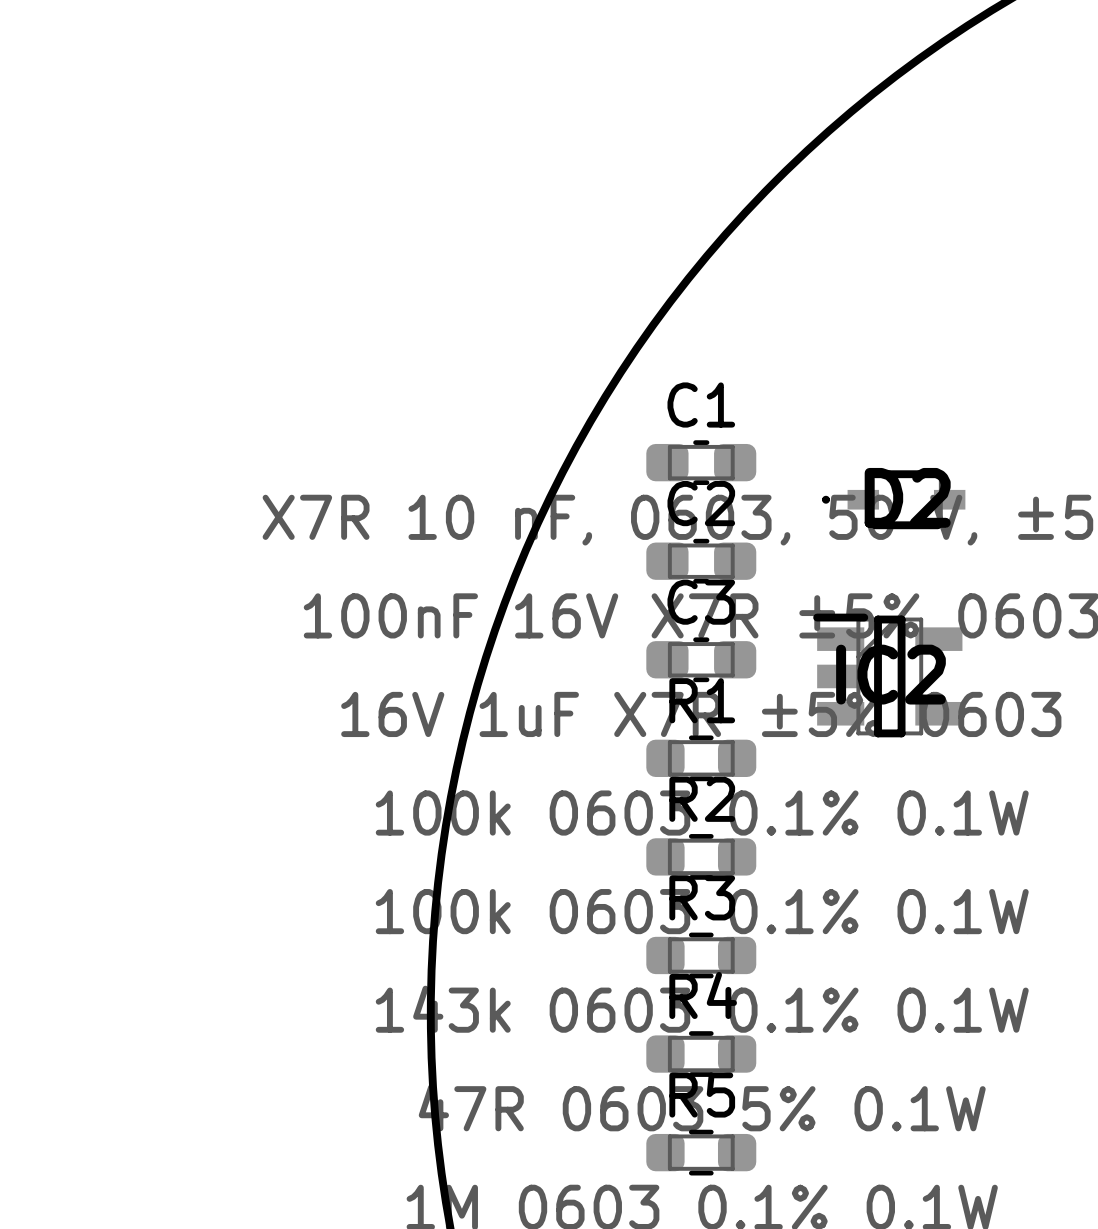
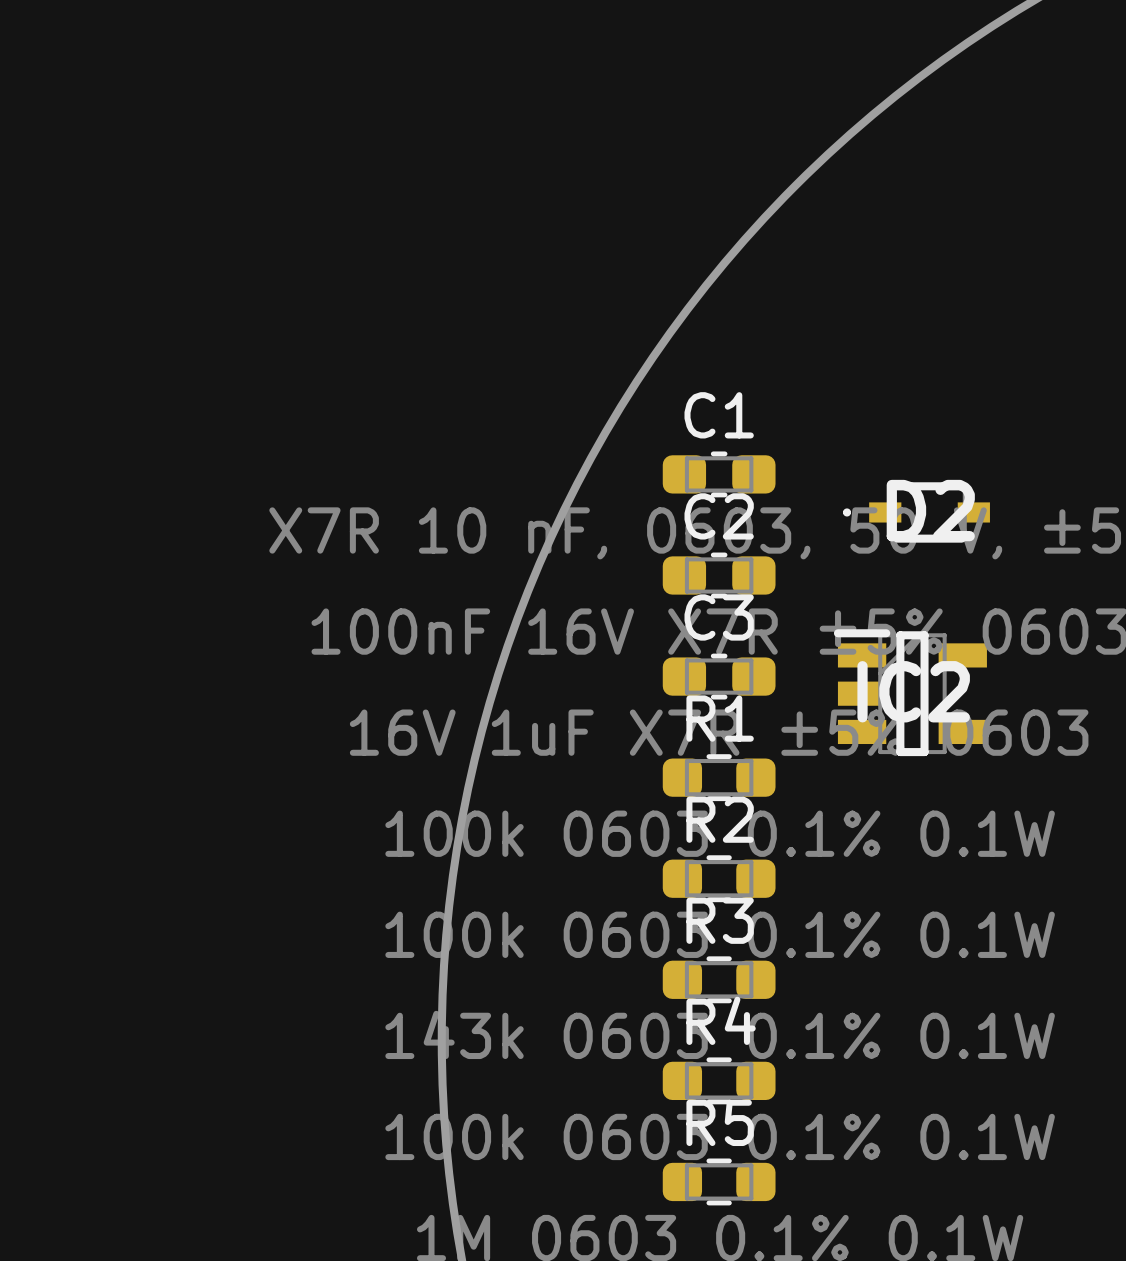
R4 value: 47R 0603 5% 0.1W (702, 1107) -> 100k 0603 0.1% 0.1W (720, 1136)

